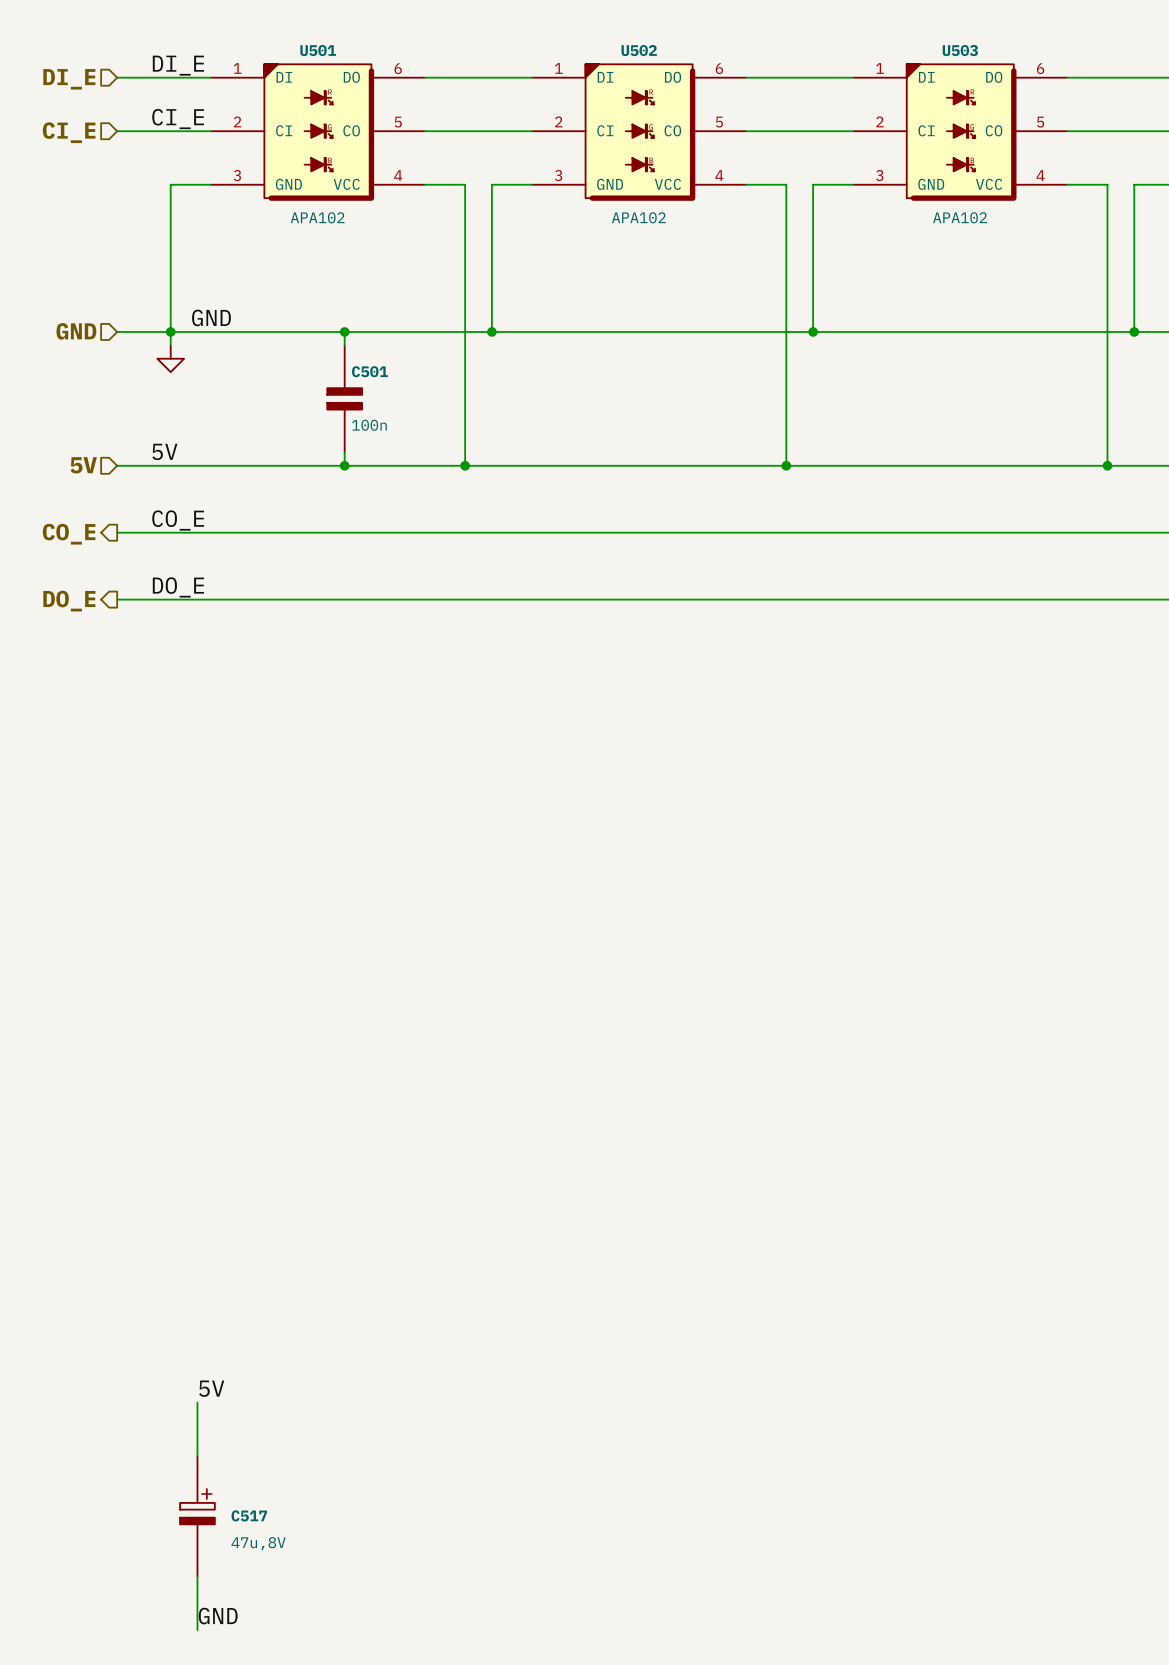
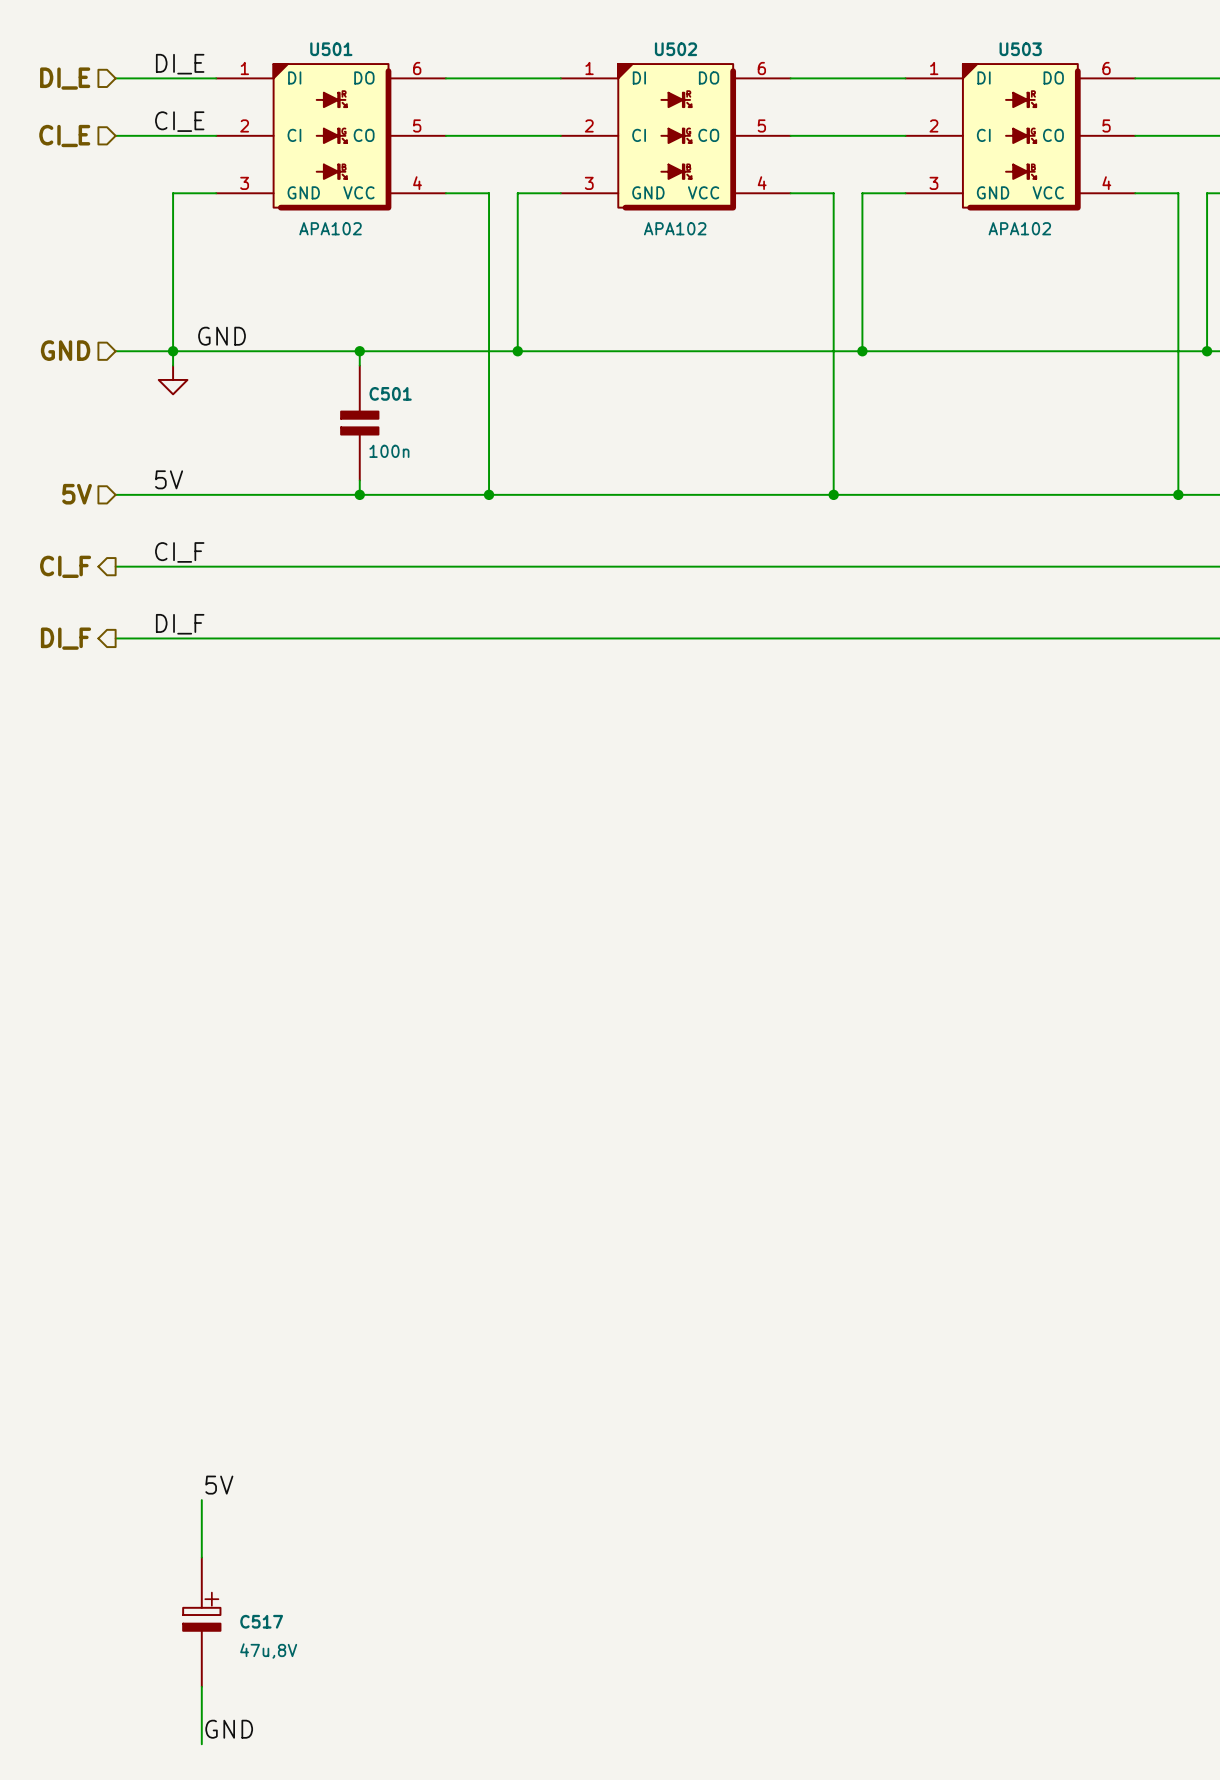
label: CO_E (178, 520) -> CI_F (179, 552)
hierarchical label: CO_E (69, 534) -> CI_F (65, 566)
label: DO_E (178, 587) -> DI_F (180, 624)
hierarchical label: DO_E (69, 601) -> DI_F (65, 638)

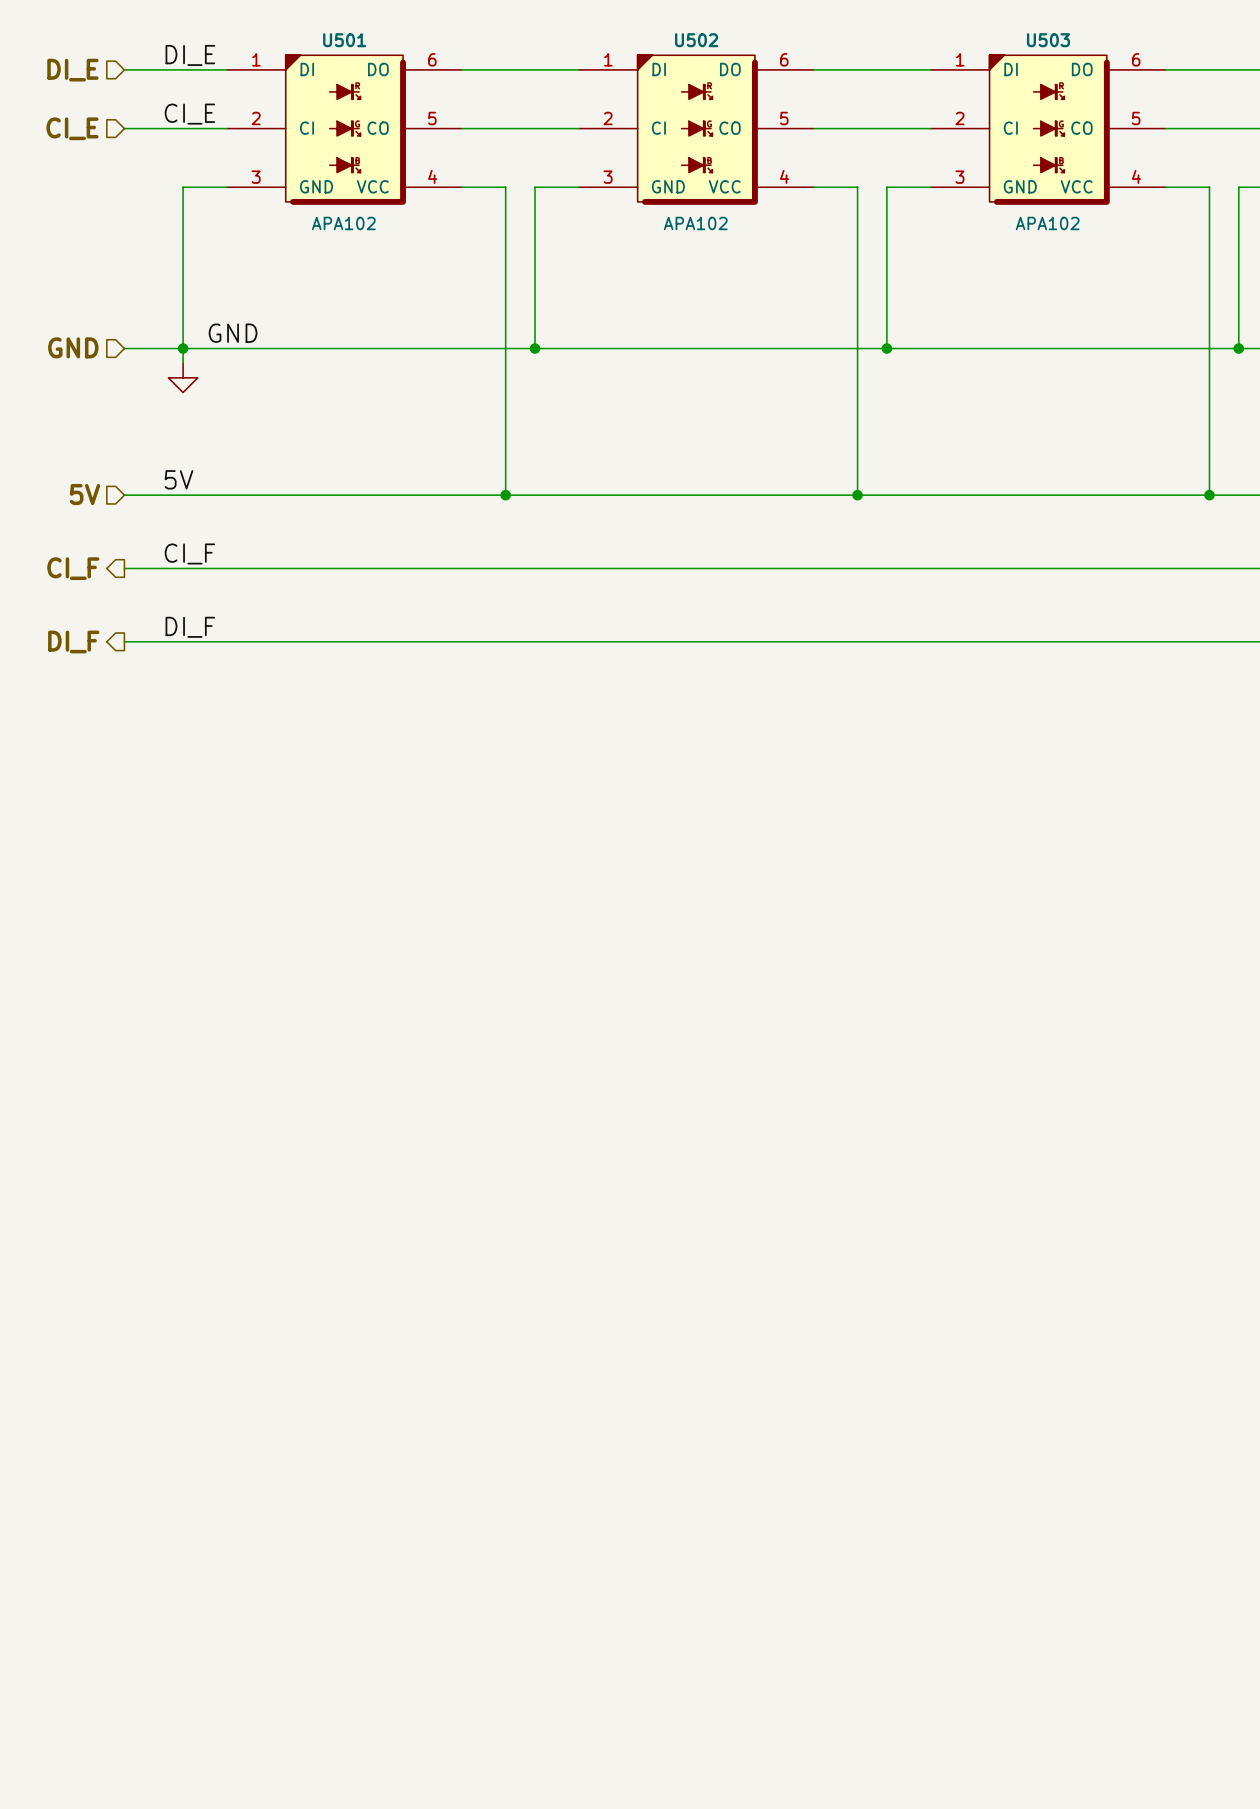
wire: (359, 351) (359, 365) -> none
junction: (359, 351) -> none
C501: 100n (359, 423) -> none
wire: (359, 480) (359, 494) -> none
junction: (359, 494) -> none
label: 5V (219, 1485) -> none
wire: (201, 1500) (201, 1557) -> none
C517: 47u,8V (201, 1622) -> none
wire: (201, 1686) (201, 1744) -> none
label: GND (229, 1729) -> none

